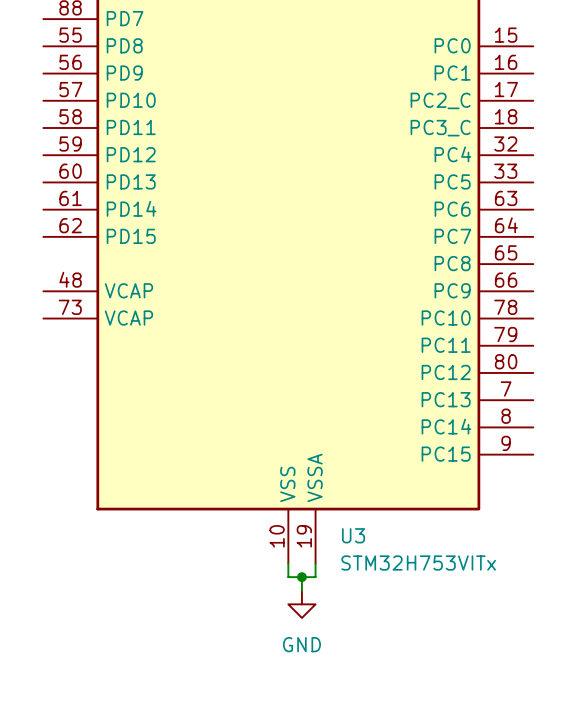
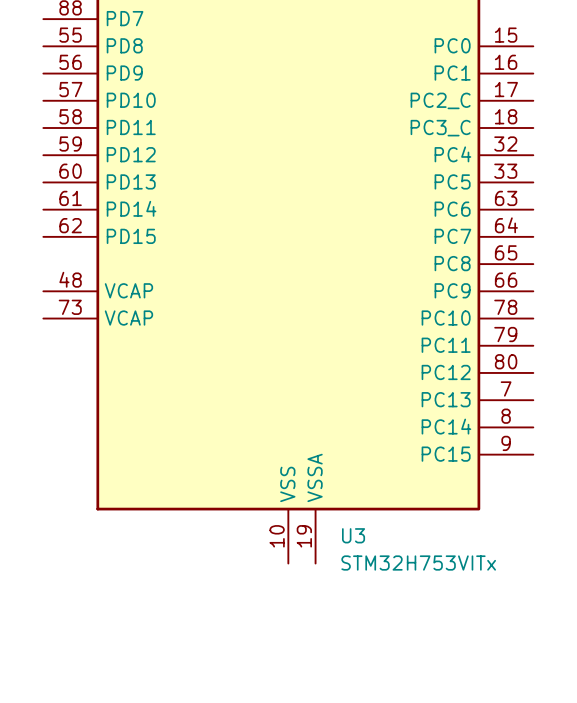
wire: (288, 563) (288, 577) (315, 577) (315, 563) -> none
wire: (301, 577) (301, 590) -> none
junction: (301, 577) -> none
power symbol: GND (301, 604) -> none

